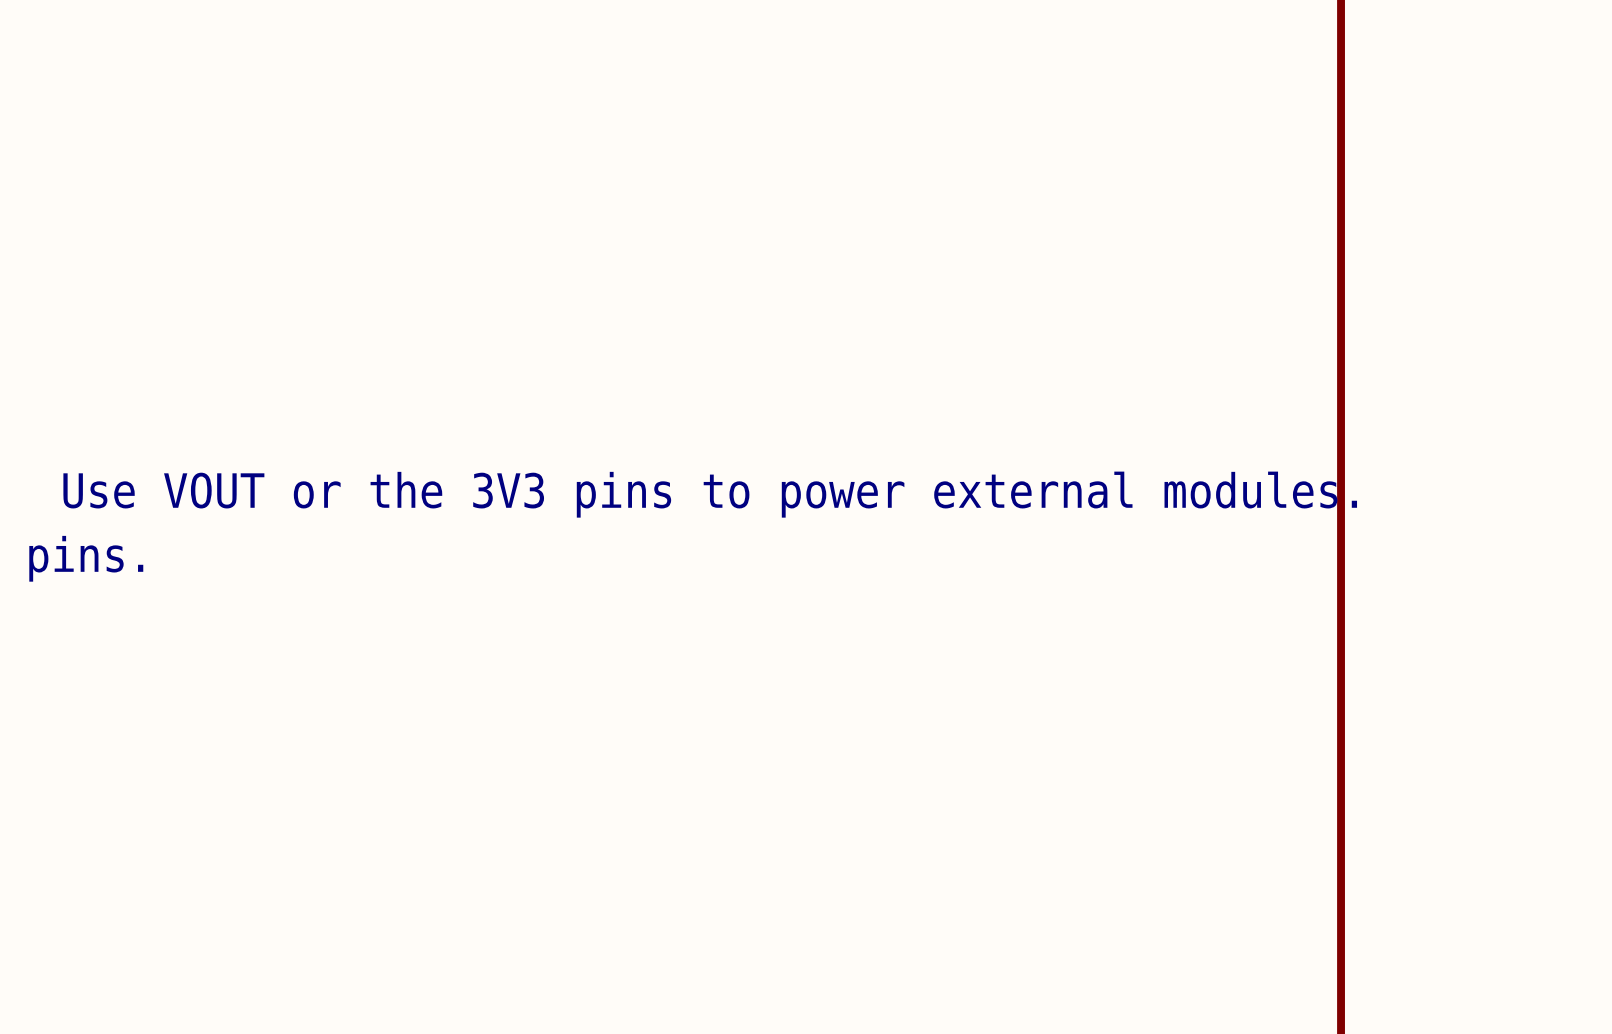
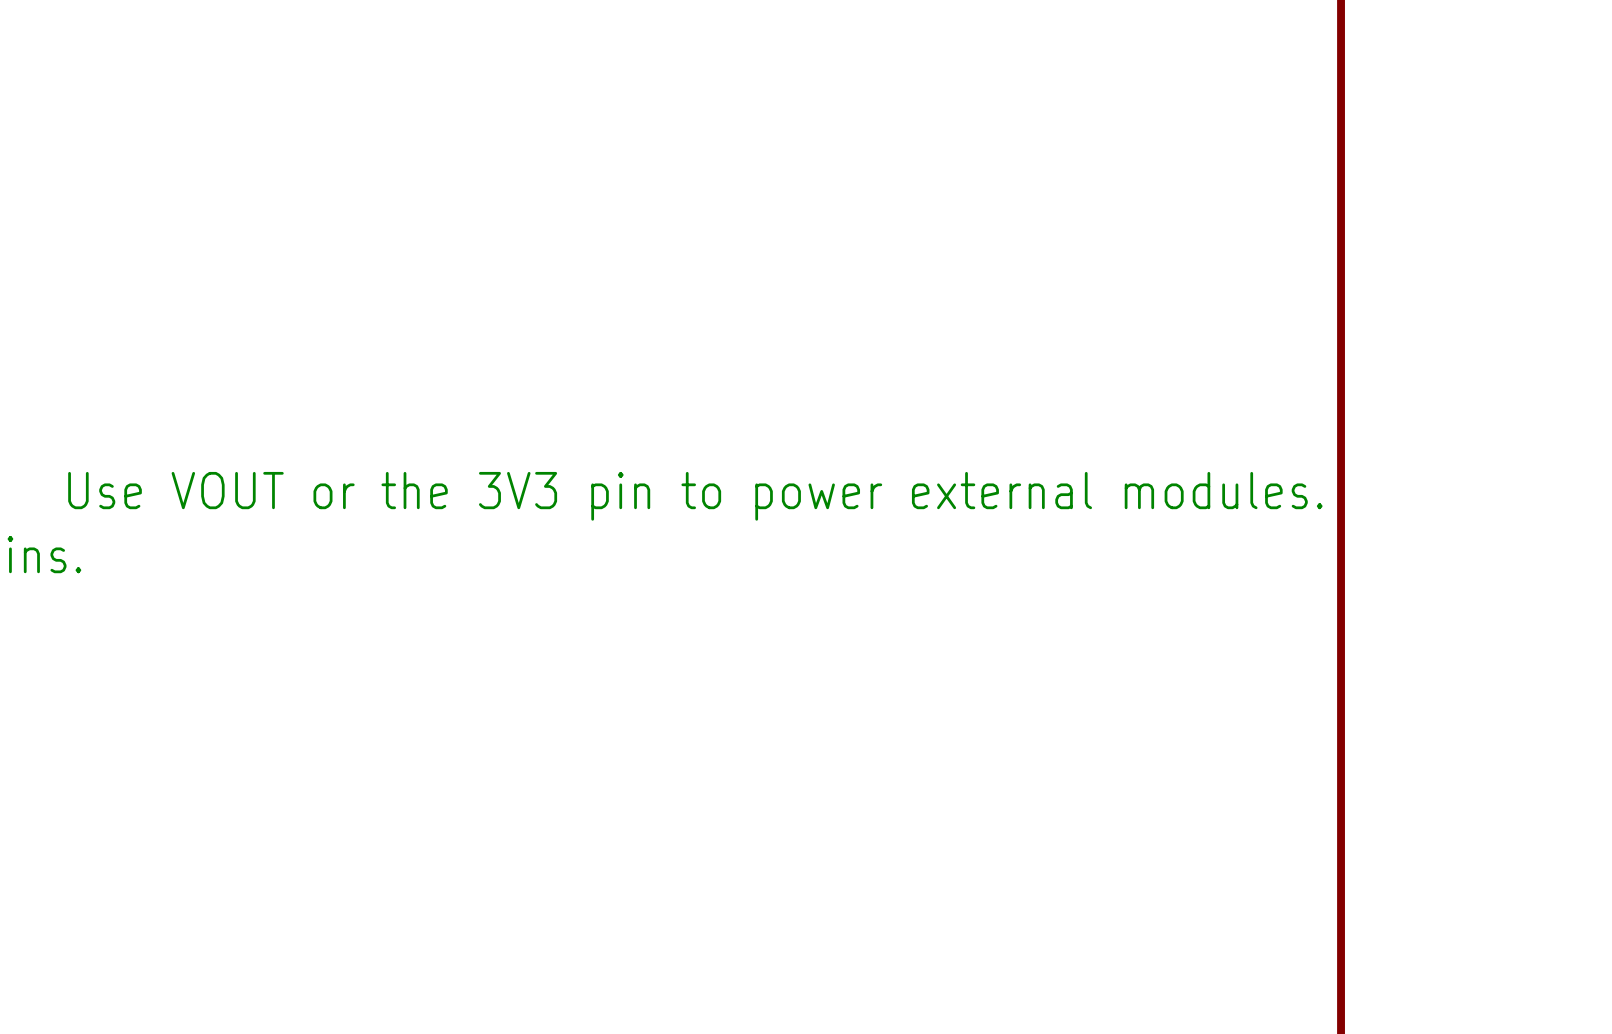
text: Use VOUT or the 3V3 pins to power external modules. (710, 494) -> Use VOUT or the 3V3 pin to power external modules. (695, 496)

